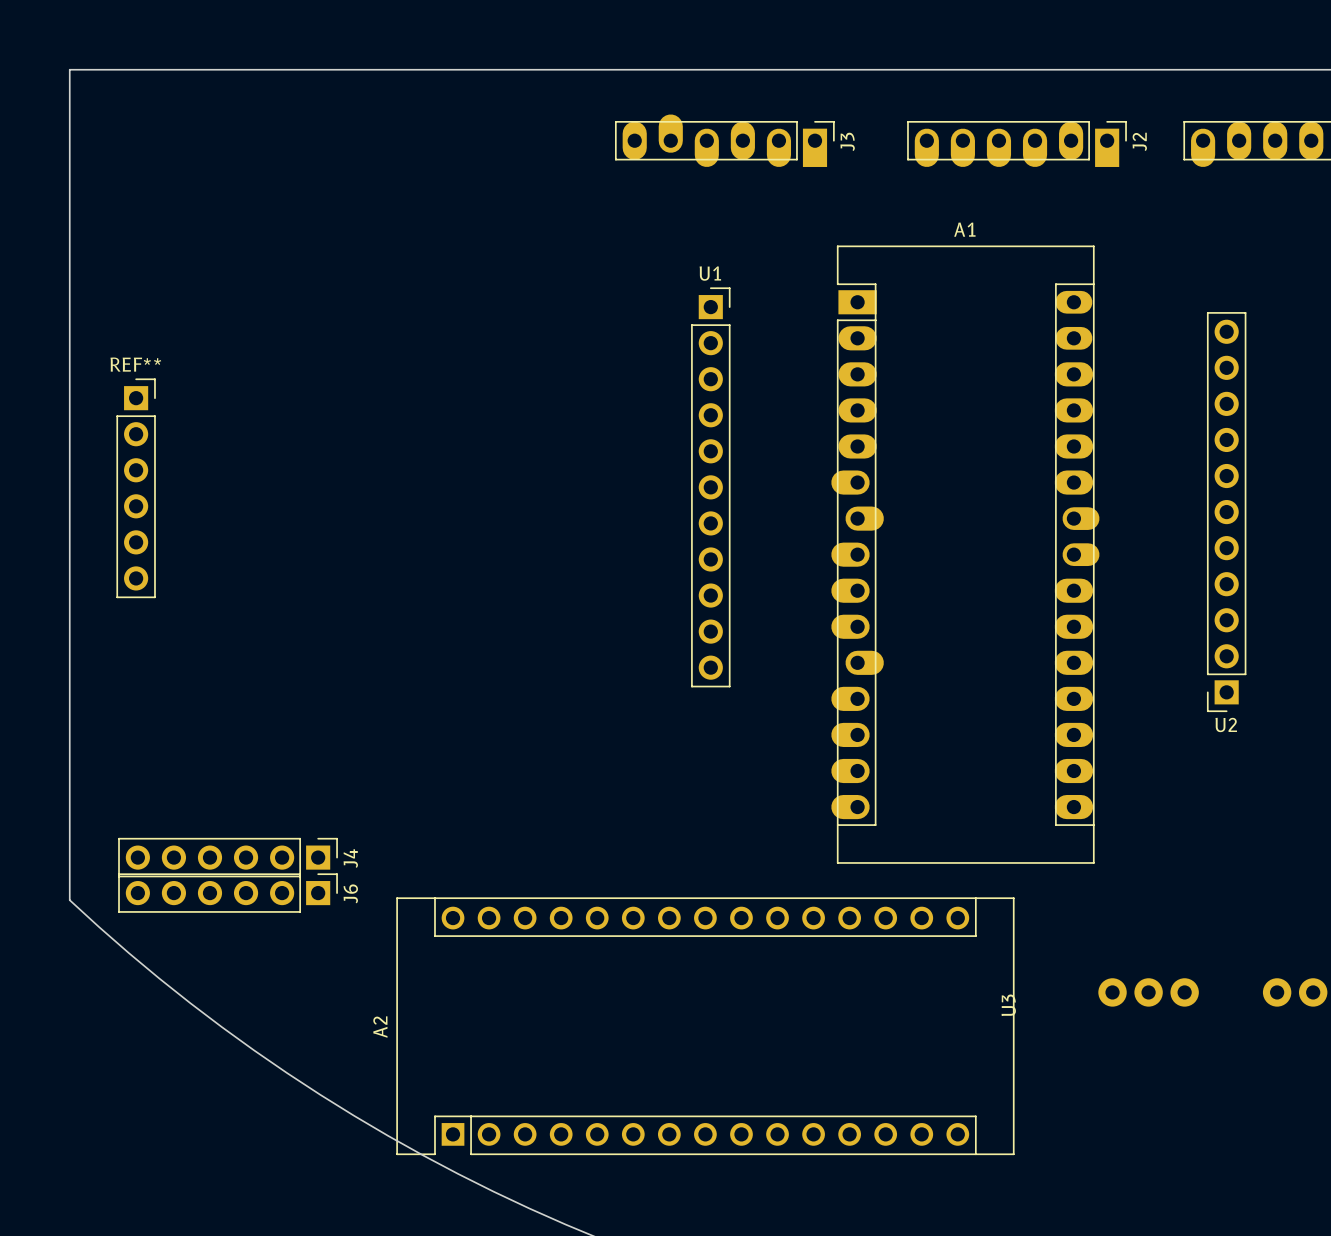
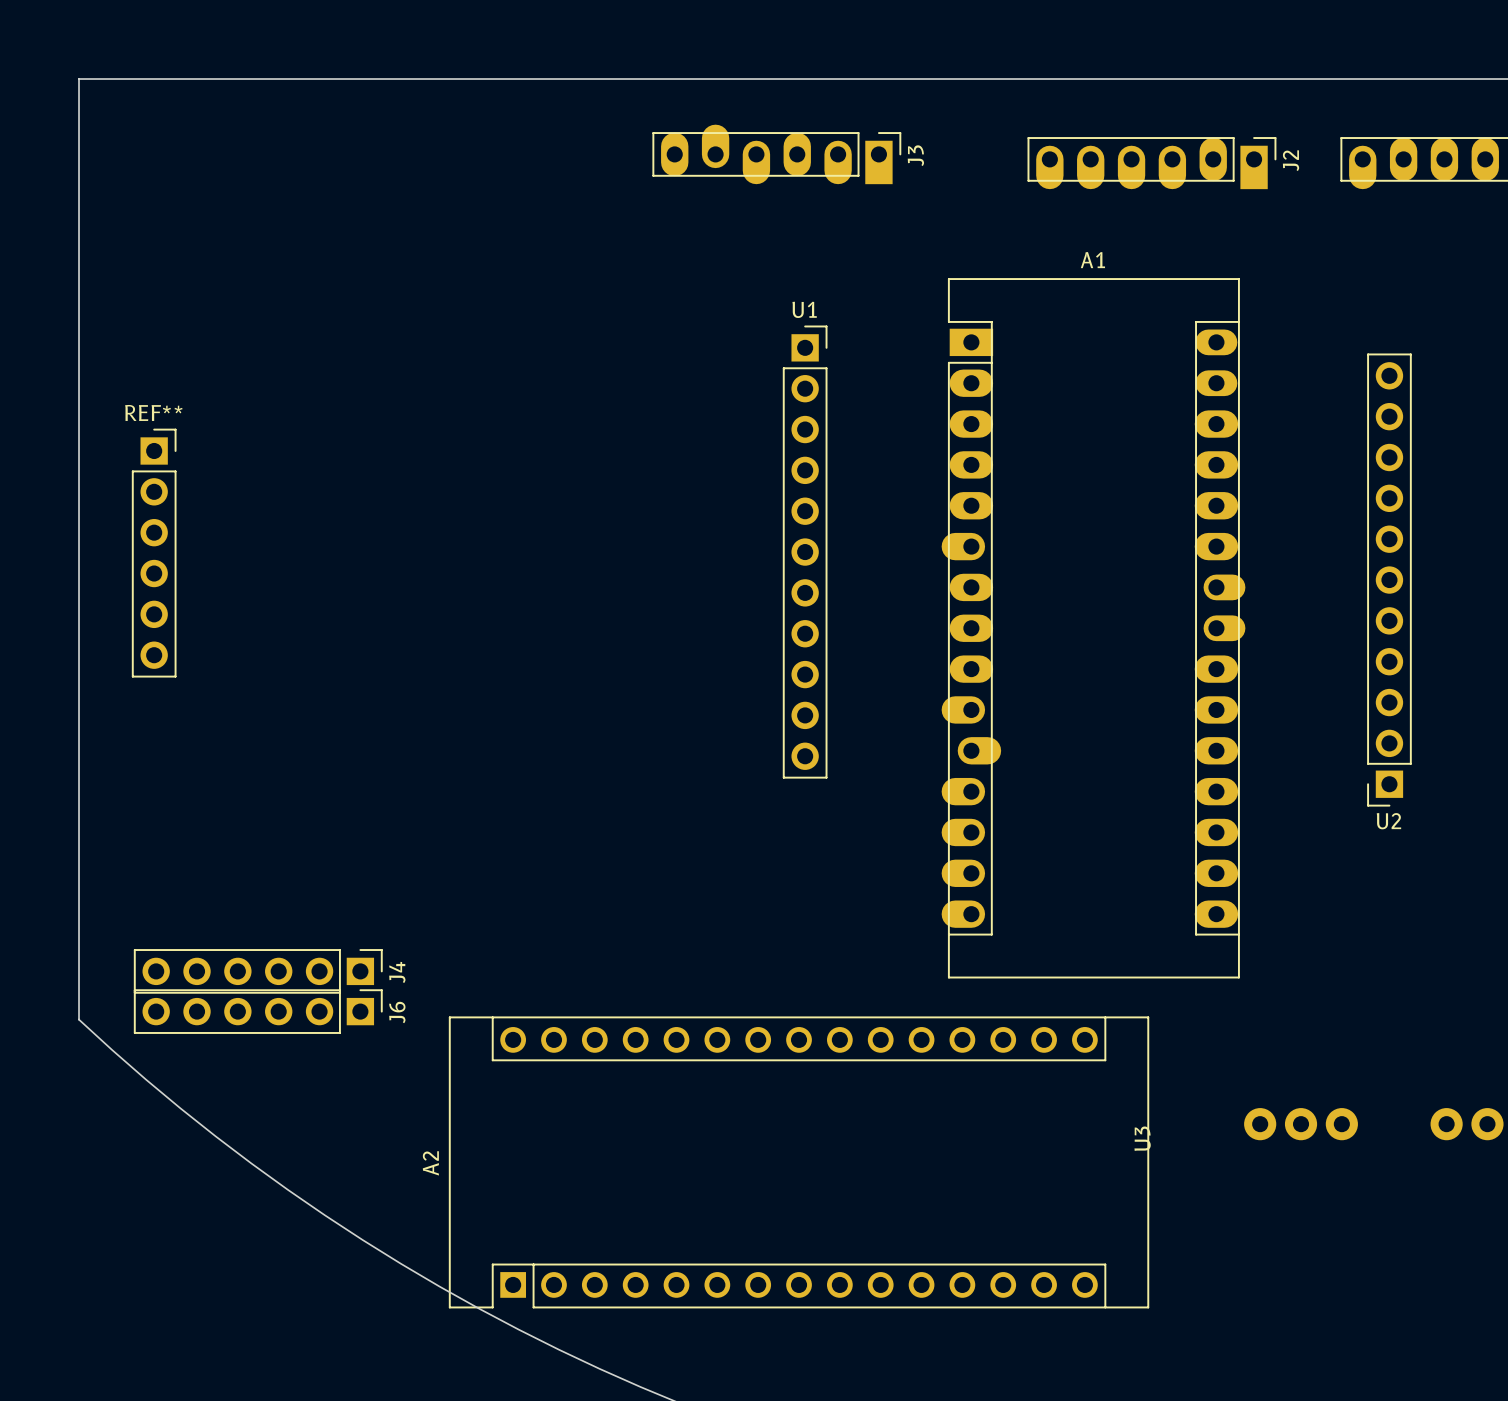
J3 position: (724, 140) -> (776, 154)
A1 footprint: [831, 245, 1100, 864] -> [941, 278, 1246, 979]

